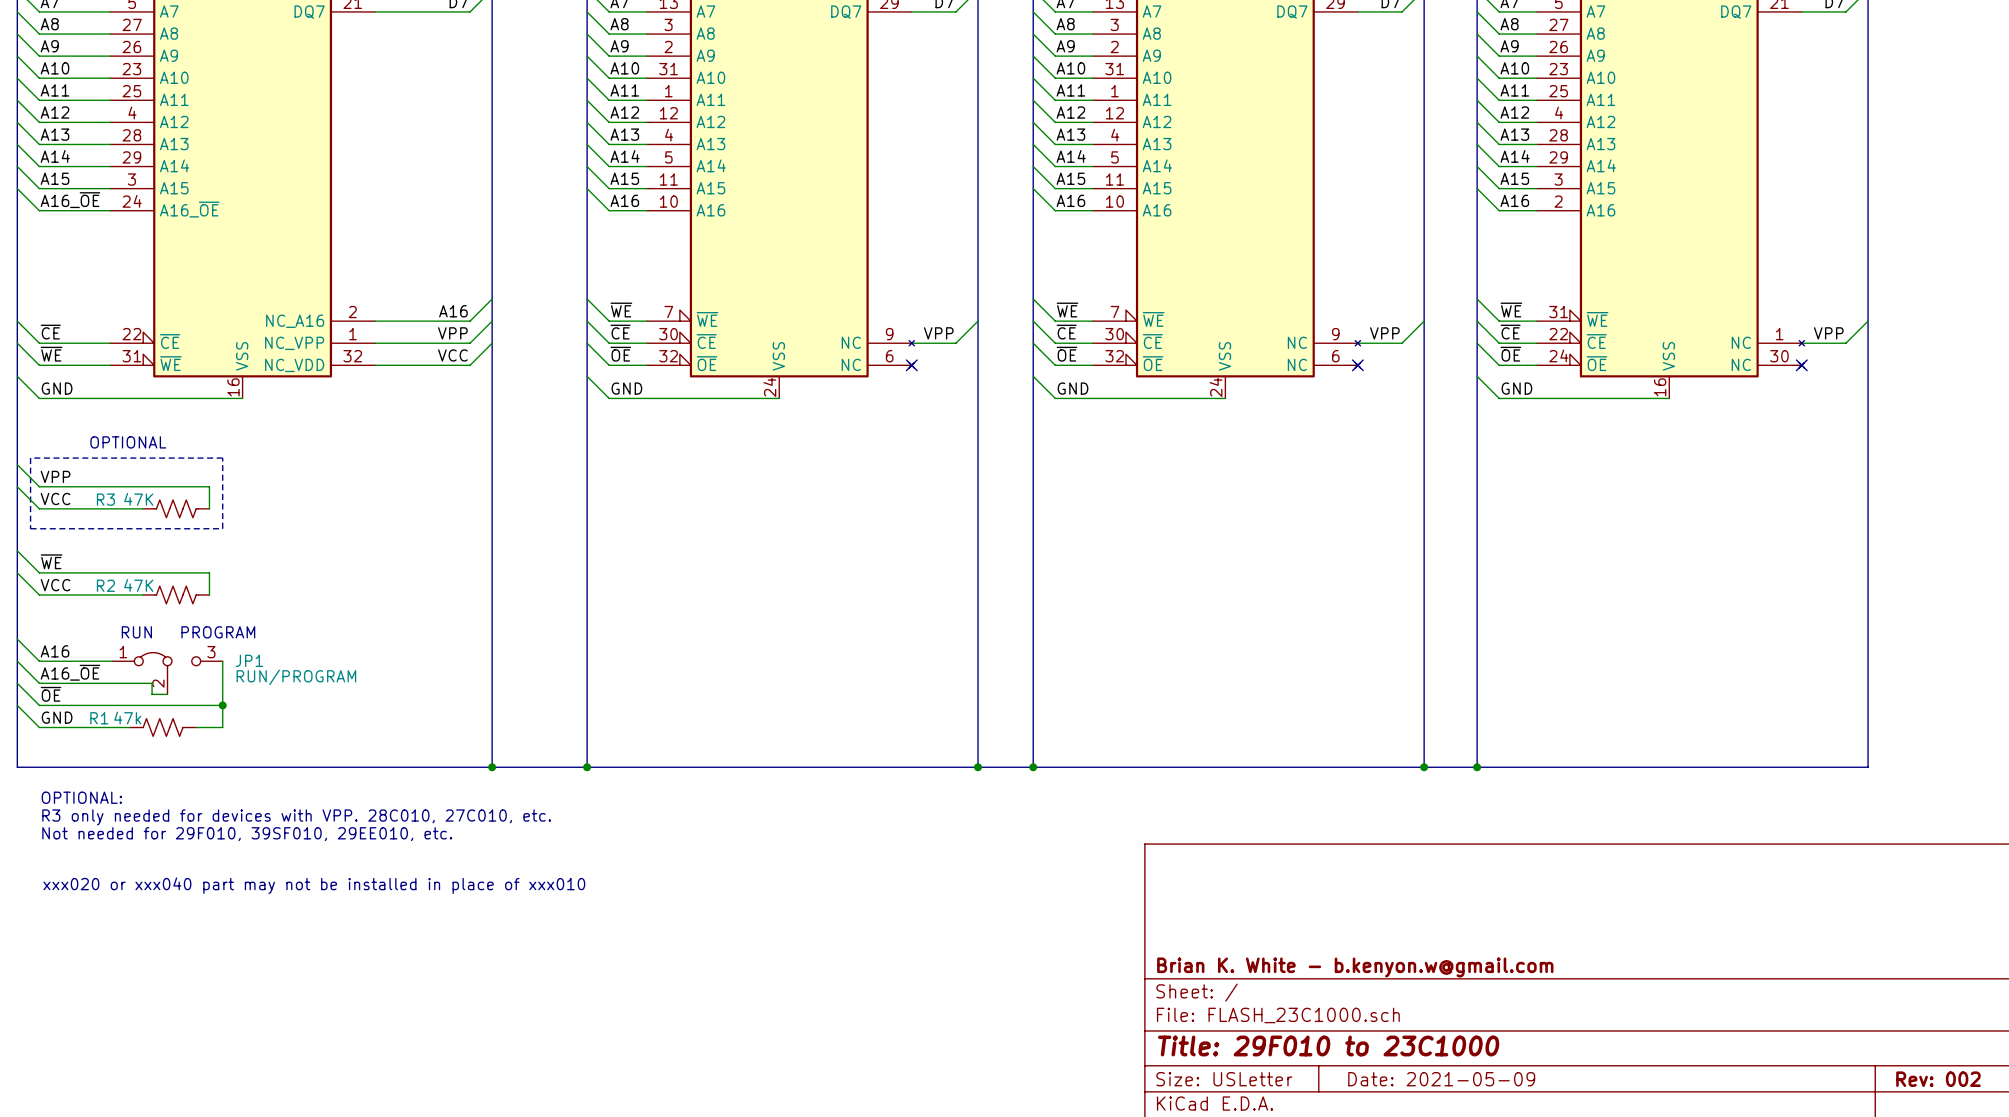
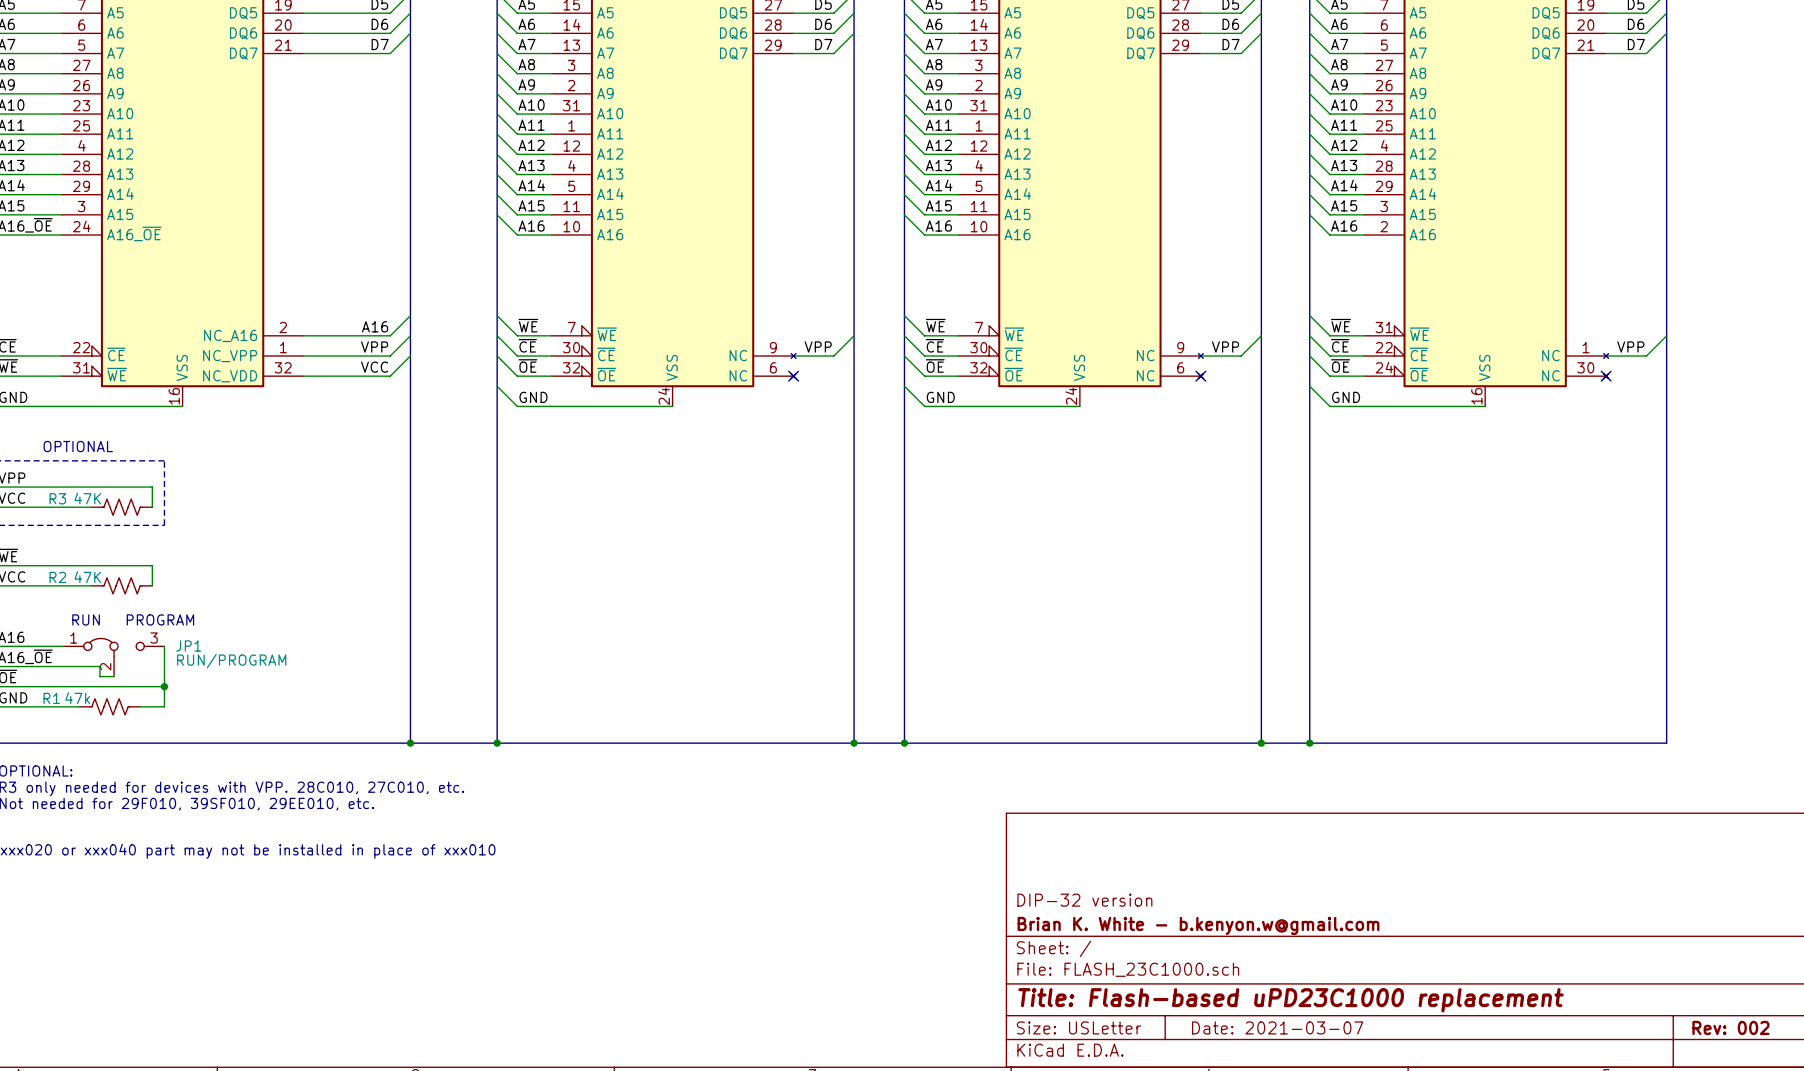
title block: none -> DIP-32 version (1084, 900)
title block: Title: 29F010 to 23C1000 (1328, 1045) -> Title: Flash-based uPD23C1000 replacement (1291, 1000)
title block: Date: 2021-05-09 (1441, 1079) -> Date: 2021-03-07 (1277, 1027)

